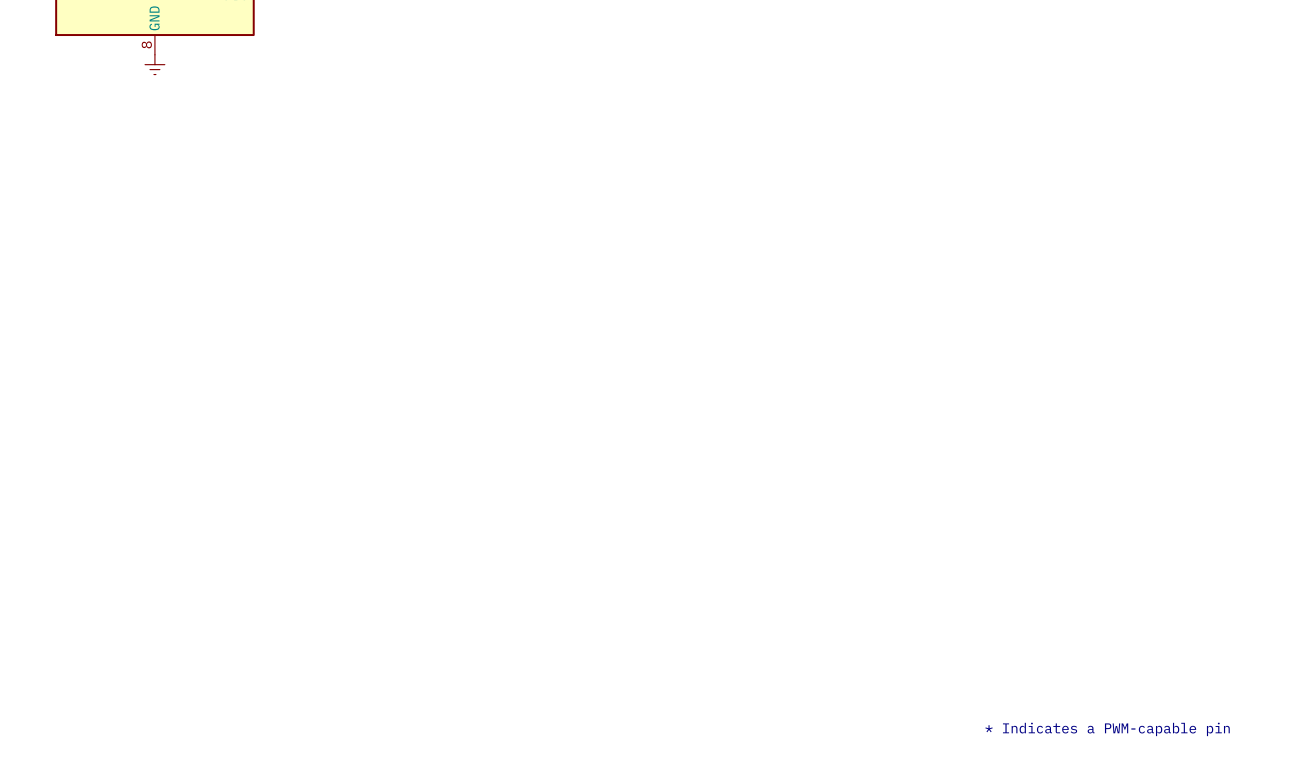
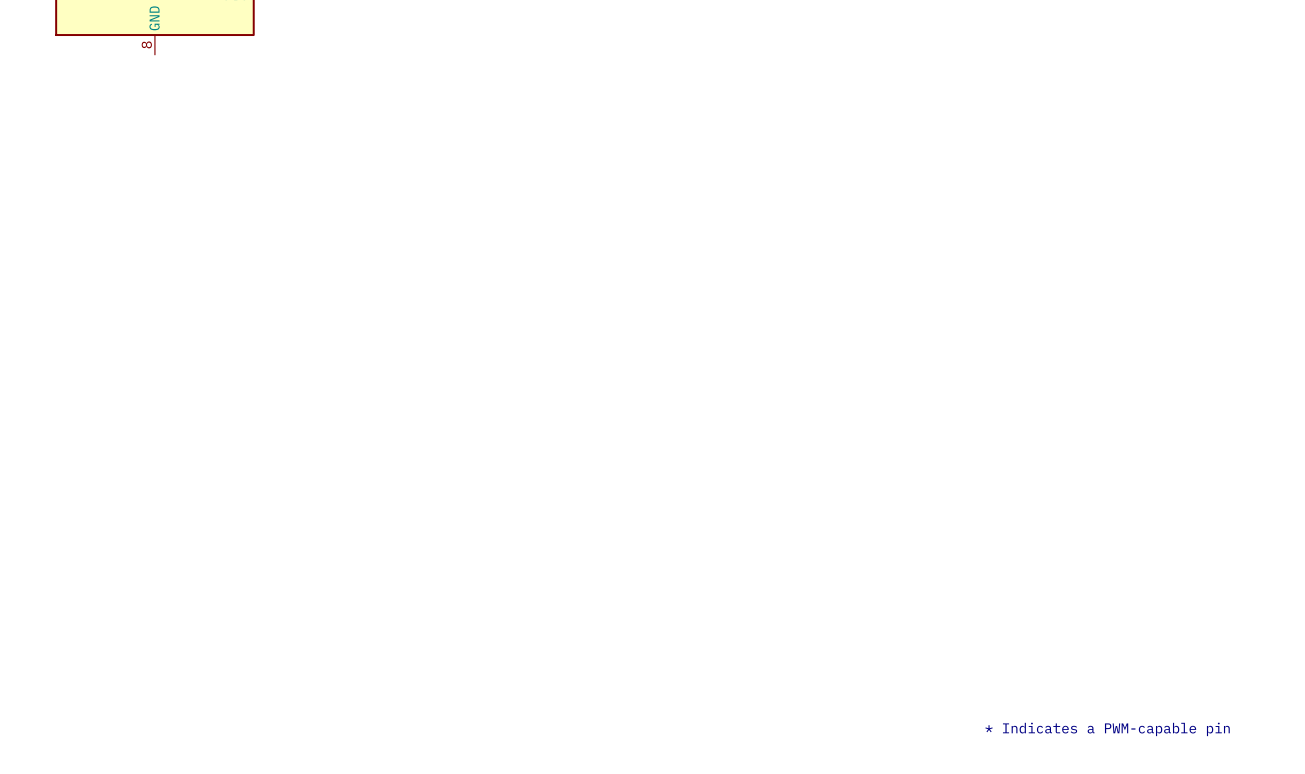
power symbol: (154, 64) -> none

